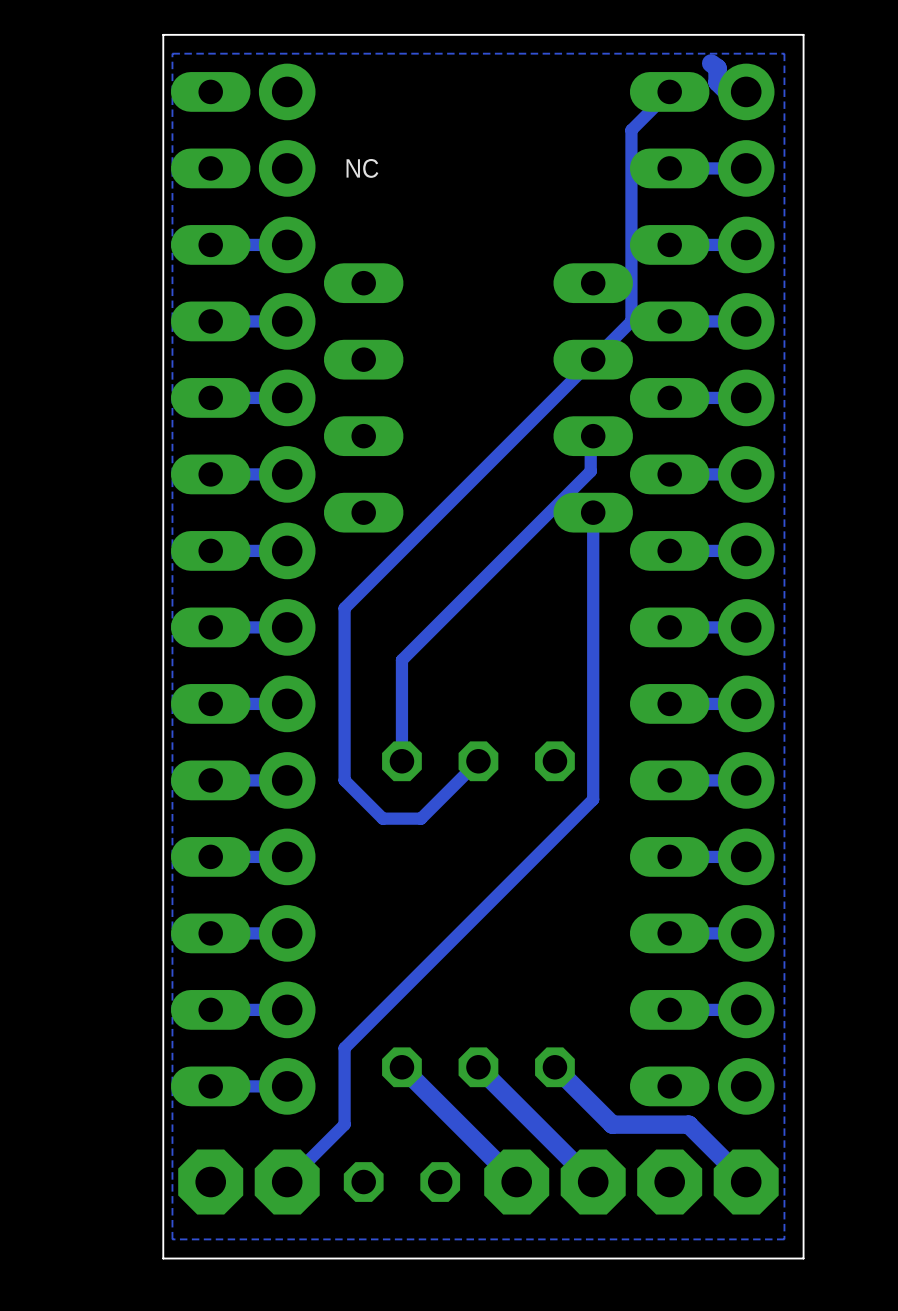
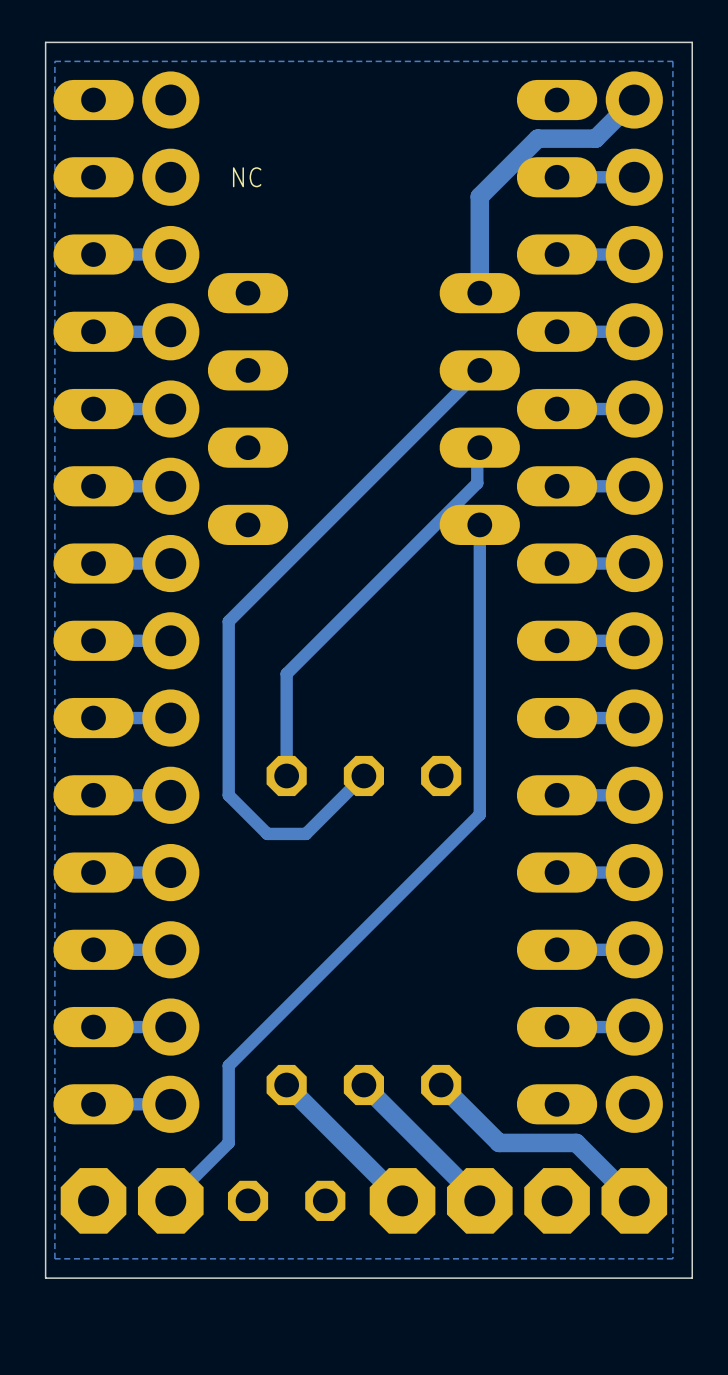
track: (711, 63) (717, 68) (717, 82) (727, 91) (746, 91) -> (479, 293) (479, 196) (537, 138) (595, 138) (634, 100)
track: (669, 91) (631, 130) (631, 321) (593, 359) -> none

